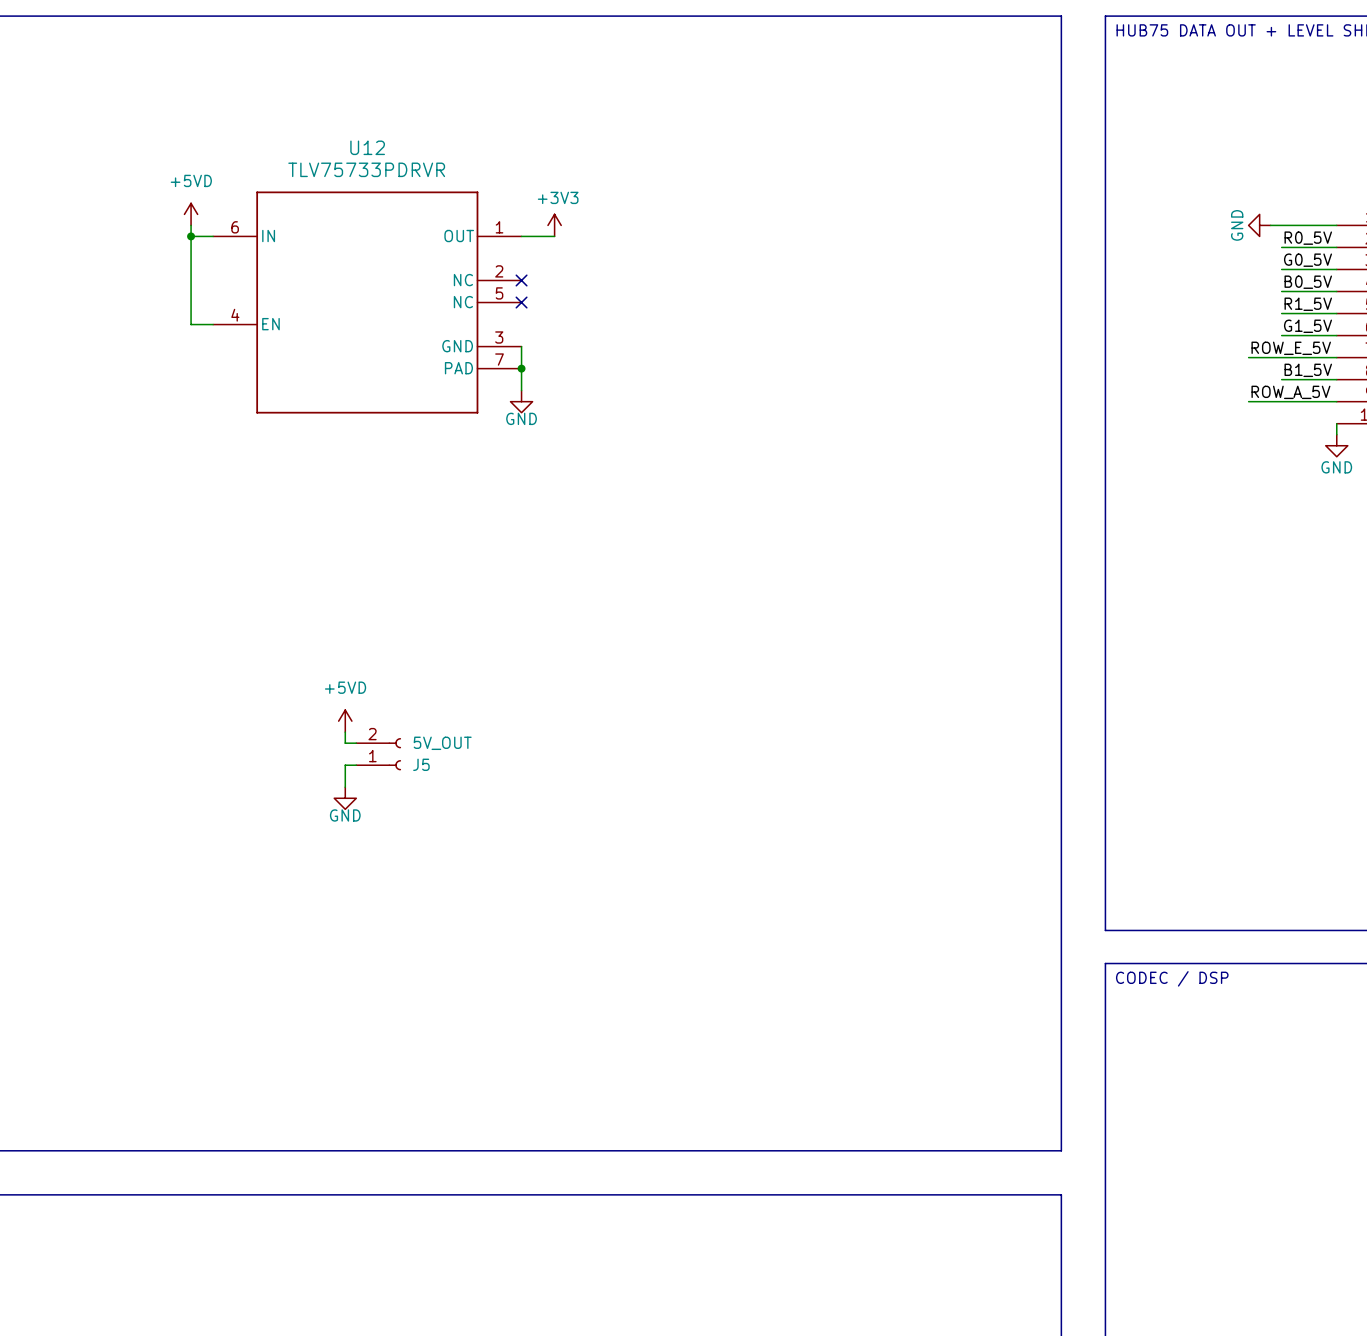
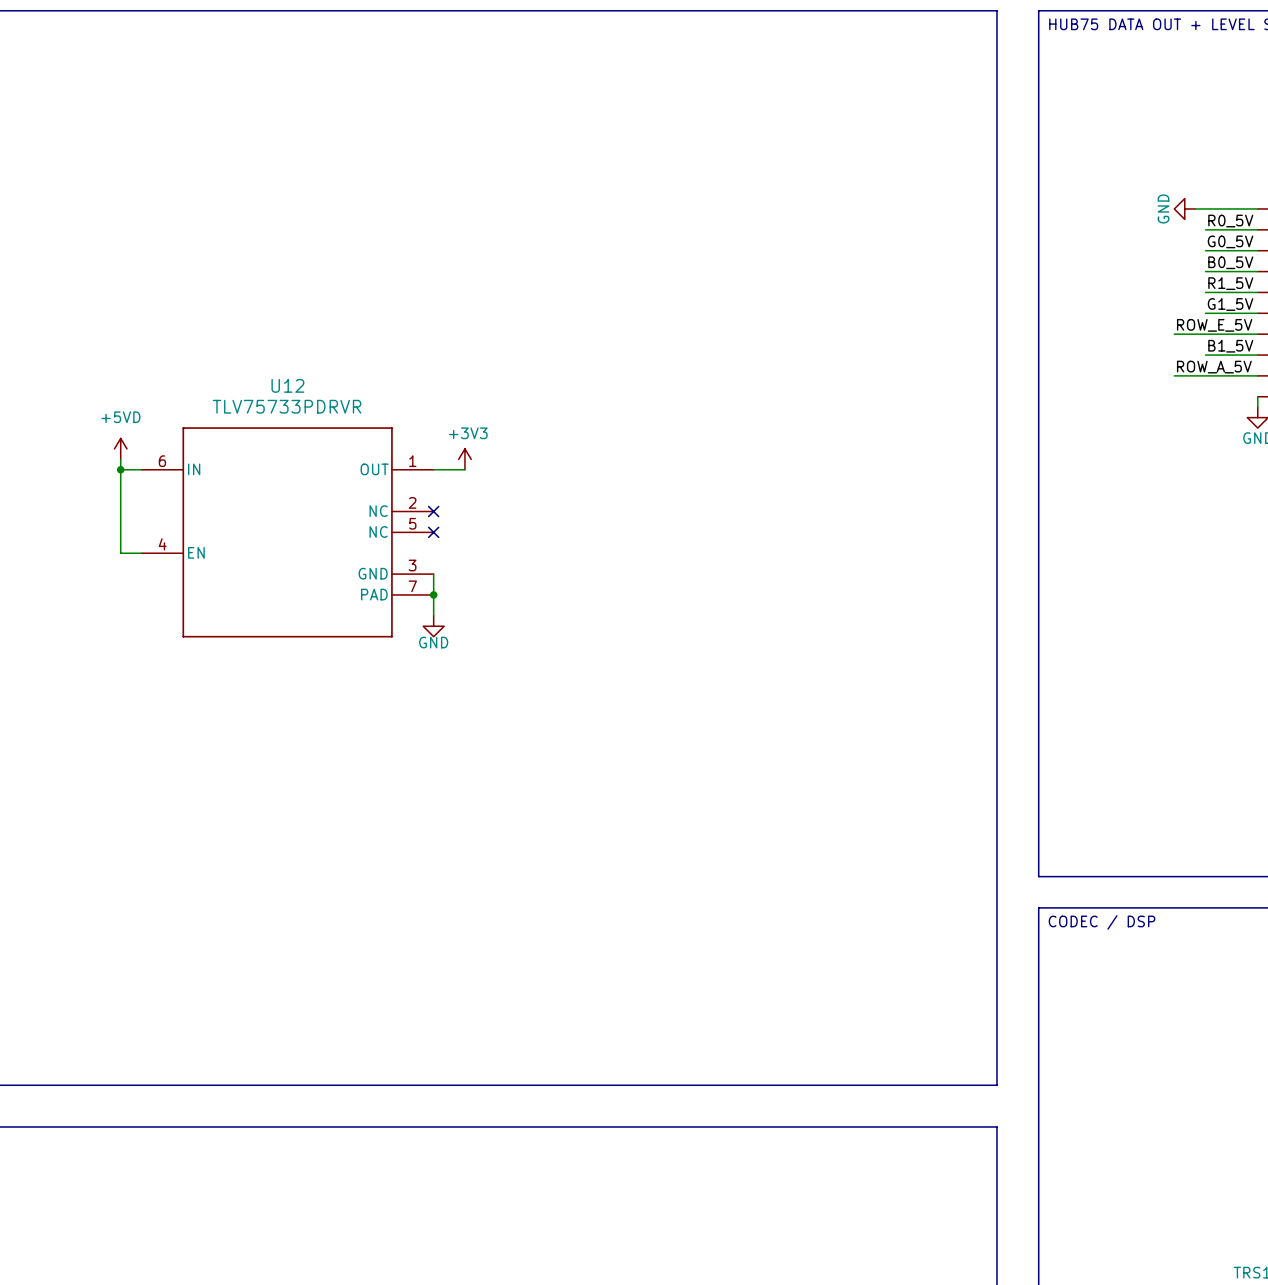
power symbol: +5VD (191, 214) -> none
wire: (191, 225) (191, 324) (213, 324) -> none
power symbol: +3V3 (554, 225) -> none
wire: (191, 236) (213, 236) -> none
junction: (191, 236) -> none
wire: (521, 236) (554, 236) -> none
no-connect mark: (521, 280) -> none
U12 position: (367, 302) -> (287, 532)
no-connect mark: (521, 302) -> none
wire: (521, 346) (521, 390) -> none
junction: (521, 368) -> none
power symbol: GND (521, 401) -> none
power symbol: none -> +5VD (120, 448)
wire: none -> (120, 459) (120, 553) (141, 553)
power symbol: none -> +3V3 (464, 459)
wire: none -> (120, 469) (141, 469)
junction: none -> (120, 469)
wire: none -> (433, 469) (464, 469)
no-connect mark: none -> (433, 511)
no-connect mark: none -> (433, 532)
wire: none -> (433, 574) (433, 615)
junction: none -> (433, 594)
power symbol: none -> GND (433, 626)
power symbol: +5VD (345, 721) -> none
wire: (345, 732) (345, 743) (356, 743) -> none
J5: 5V_OUT (378, 754) -> none
wire: (356, 765) (345, 765) (345, 787) -> none
power symbol: GND (345, 798) -> none

